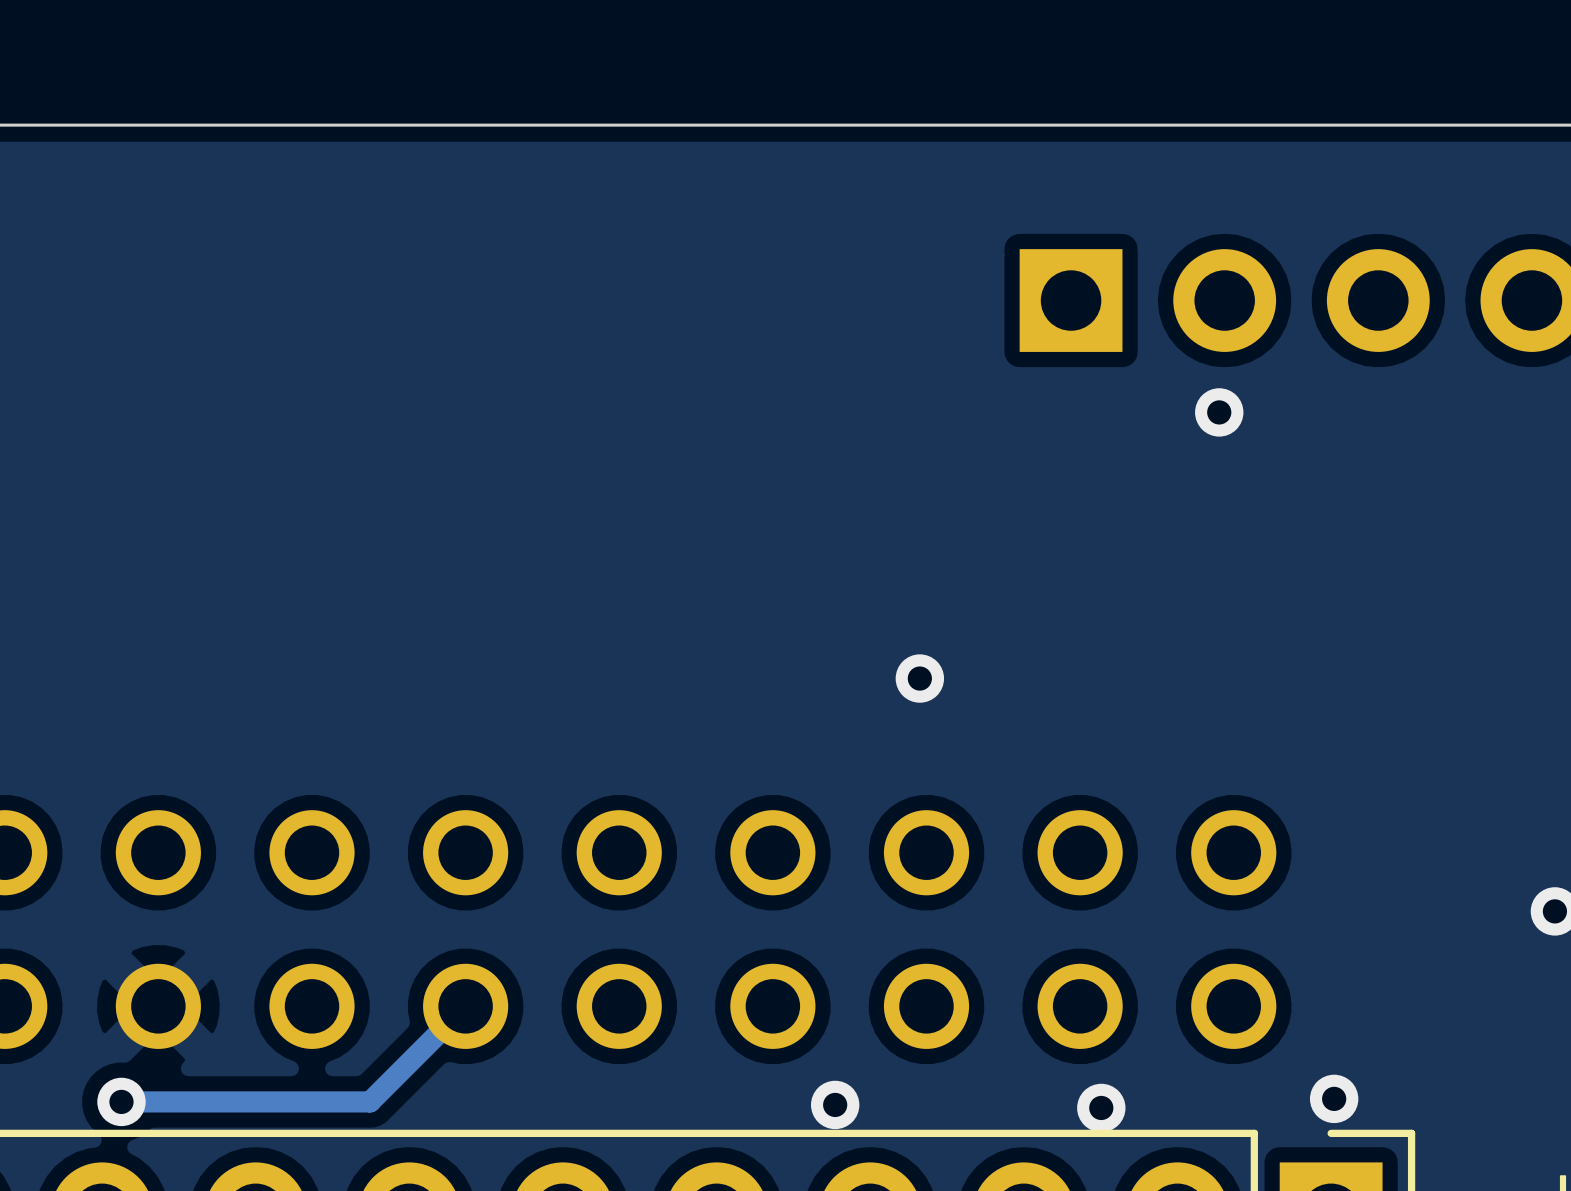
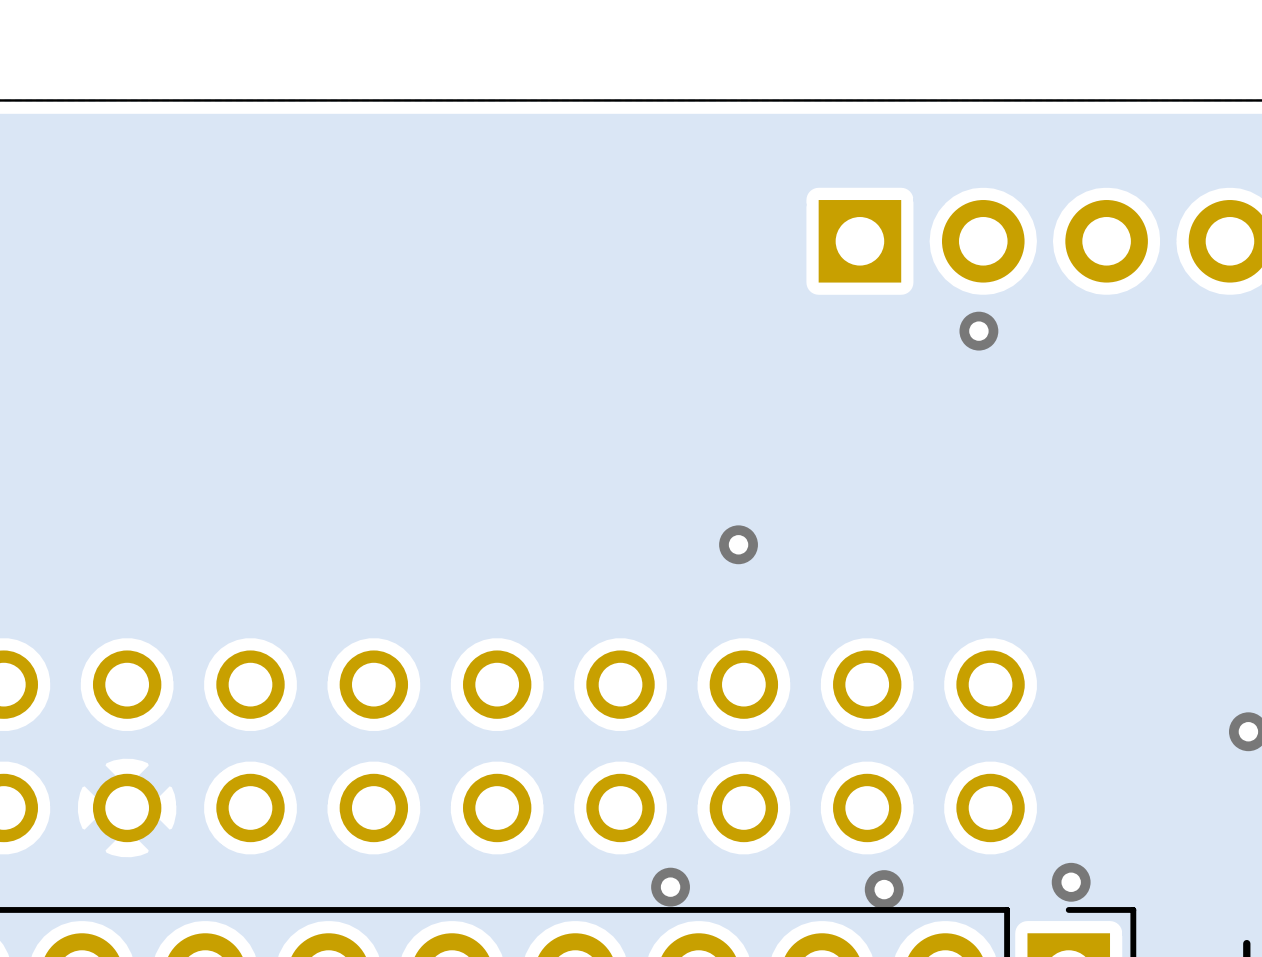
track: (465, 1006) (370, 1101) (121, 1101) -> none
via: (121, 1101) -> none

